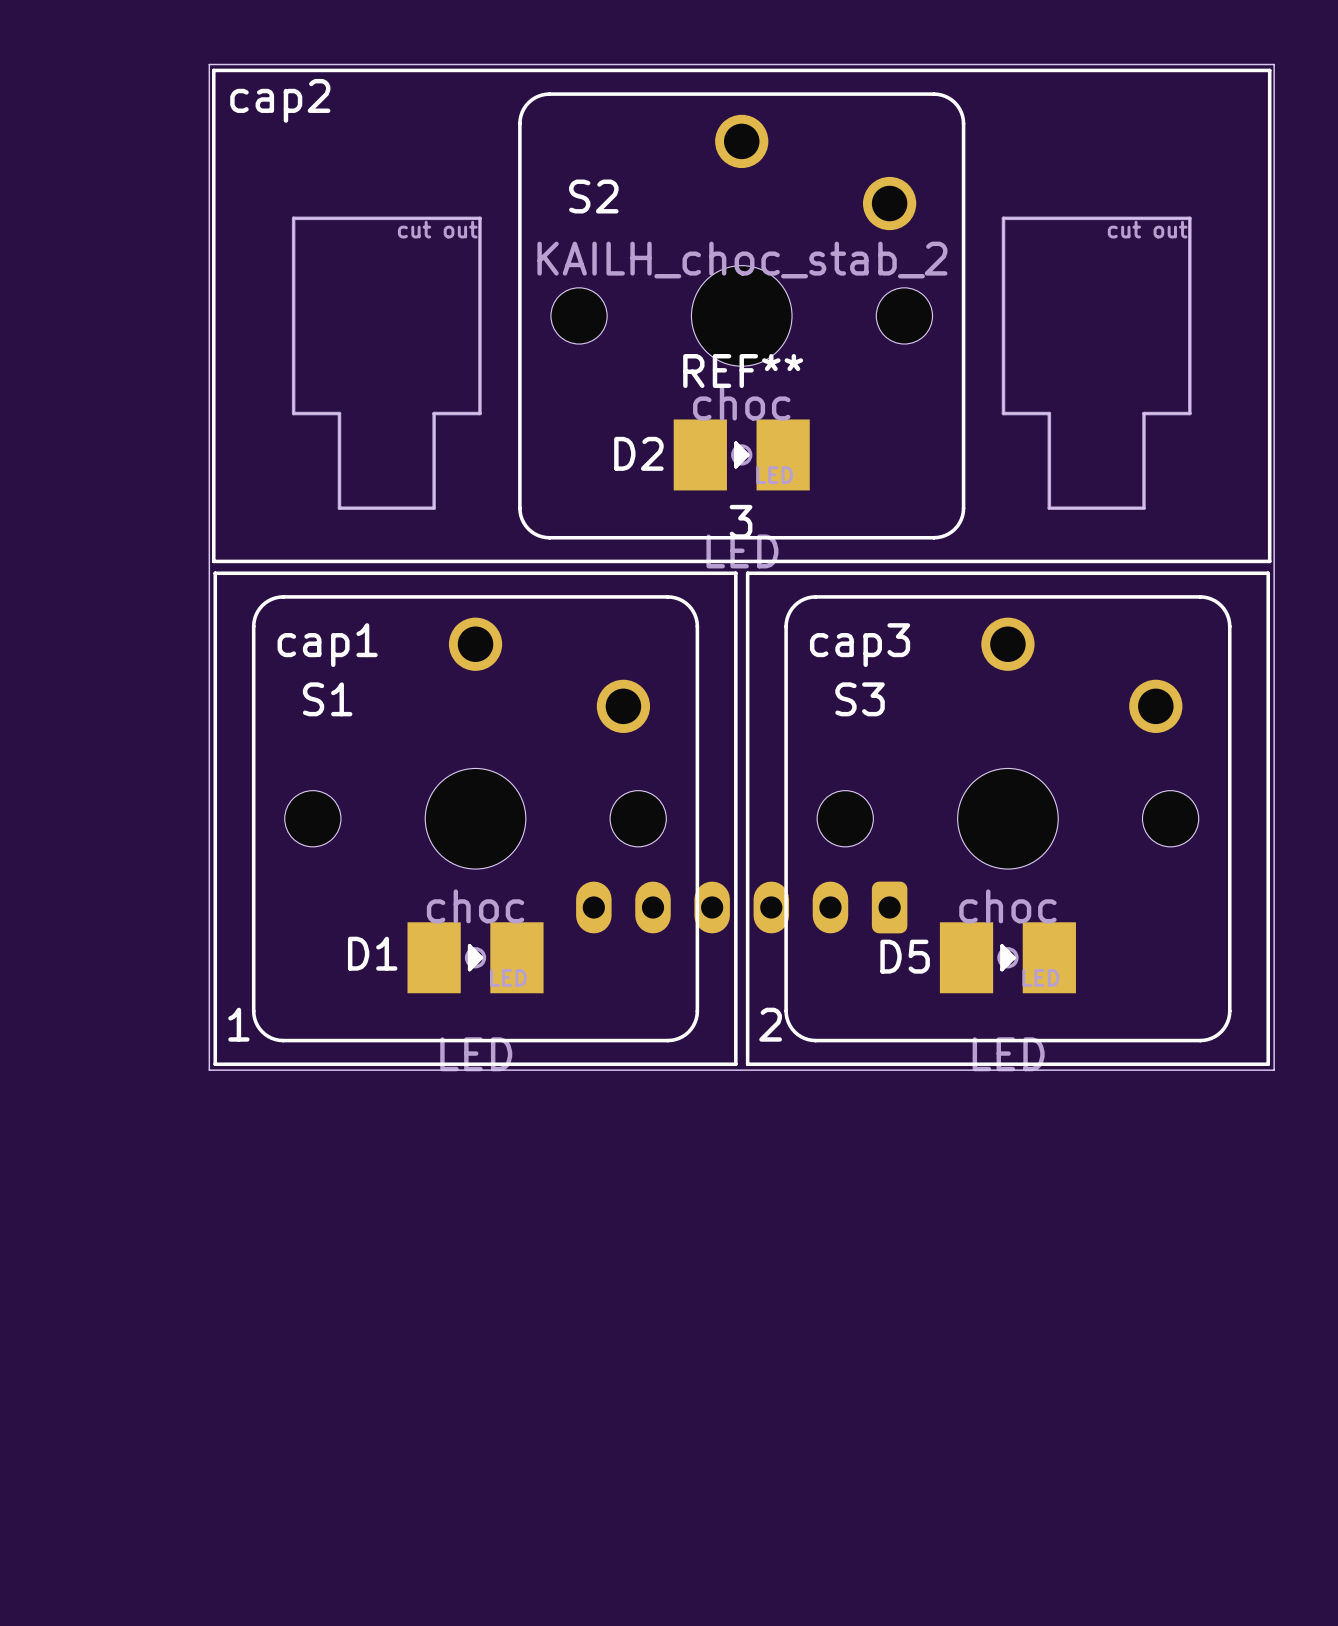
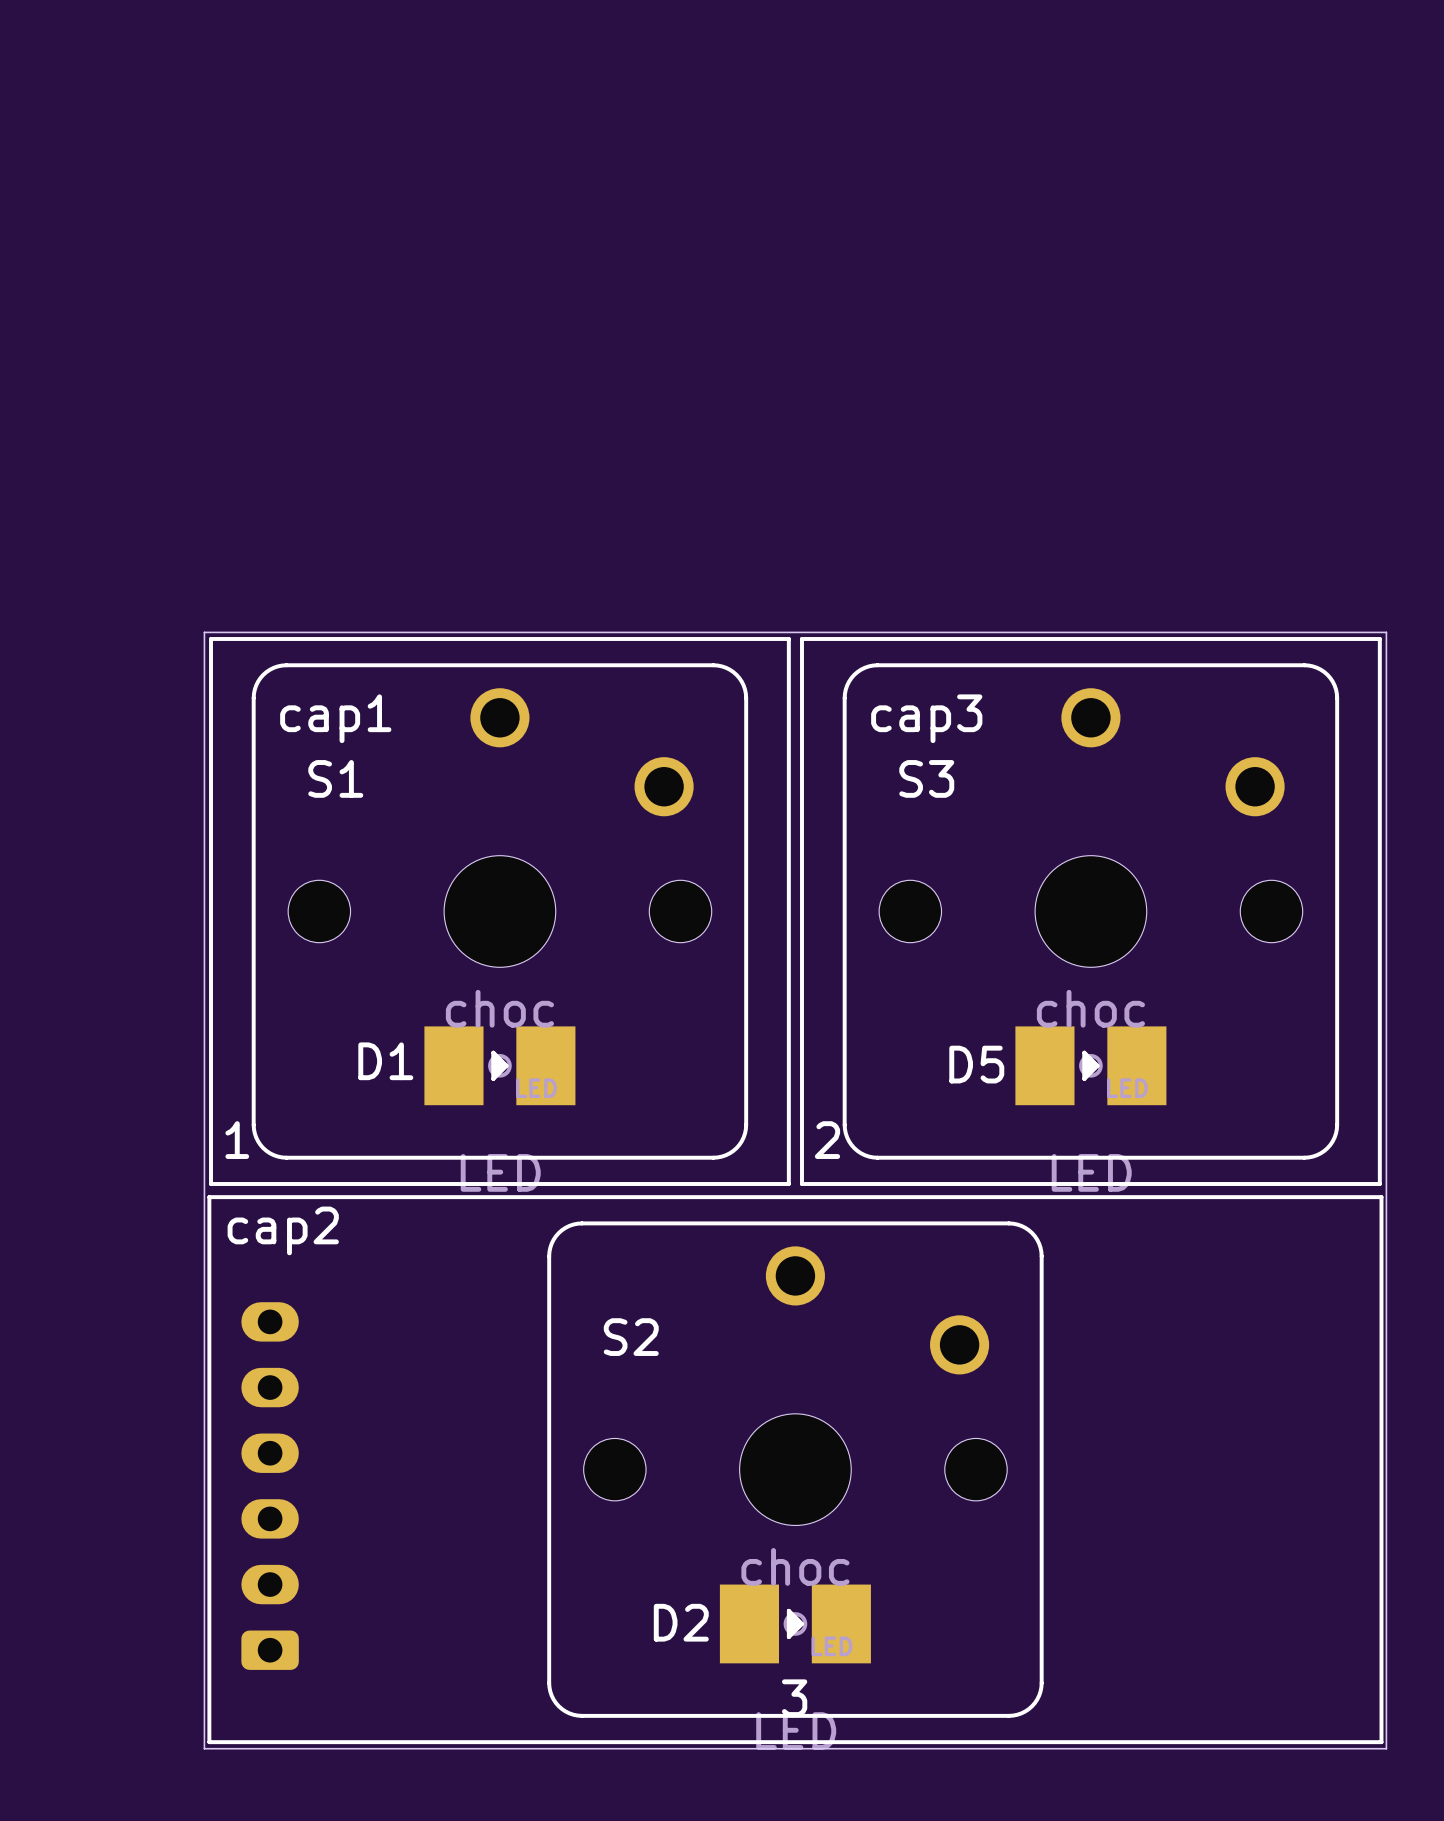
cap2 position: (741, 315) -> (795, 1469)
S2 position: (741, 315) -> (795, 1469)
REF**: KAILH_choc_stab_2 (741, 363) -> none
D2 position: (741, 454) -> (795, 1623)
board edge: (209, 567) (209, 64) (1274, 64) (1274, 567) -> (204, 632) (1386, 632)
part rotation: 0° (741, 907) -> 90° clockwise (270, 1486)
part position: (741, 907) -> (270, 1486)
board edge: (209, 1070) (1274, 1070) -> (204, 1190) (204, 1748) (1386, 1748) (1386, 1190)

